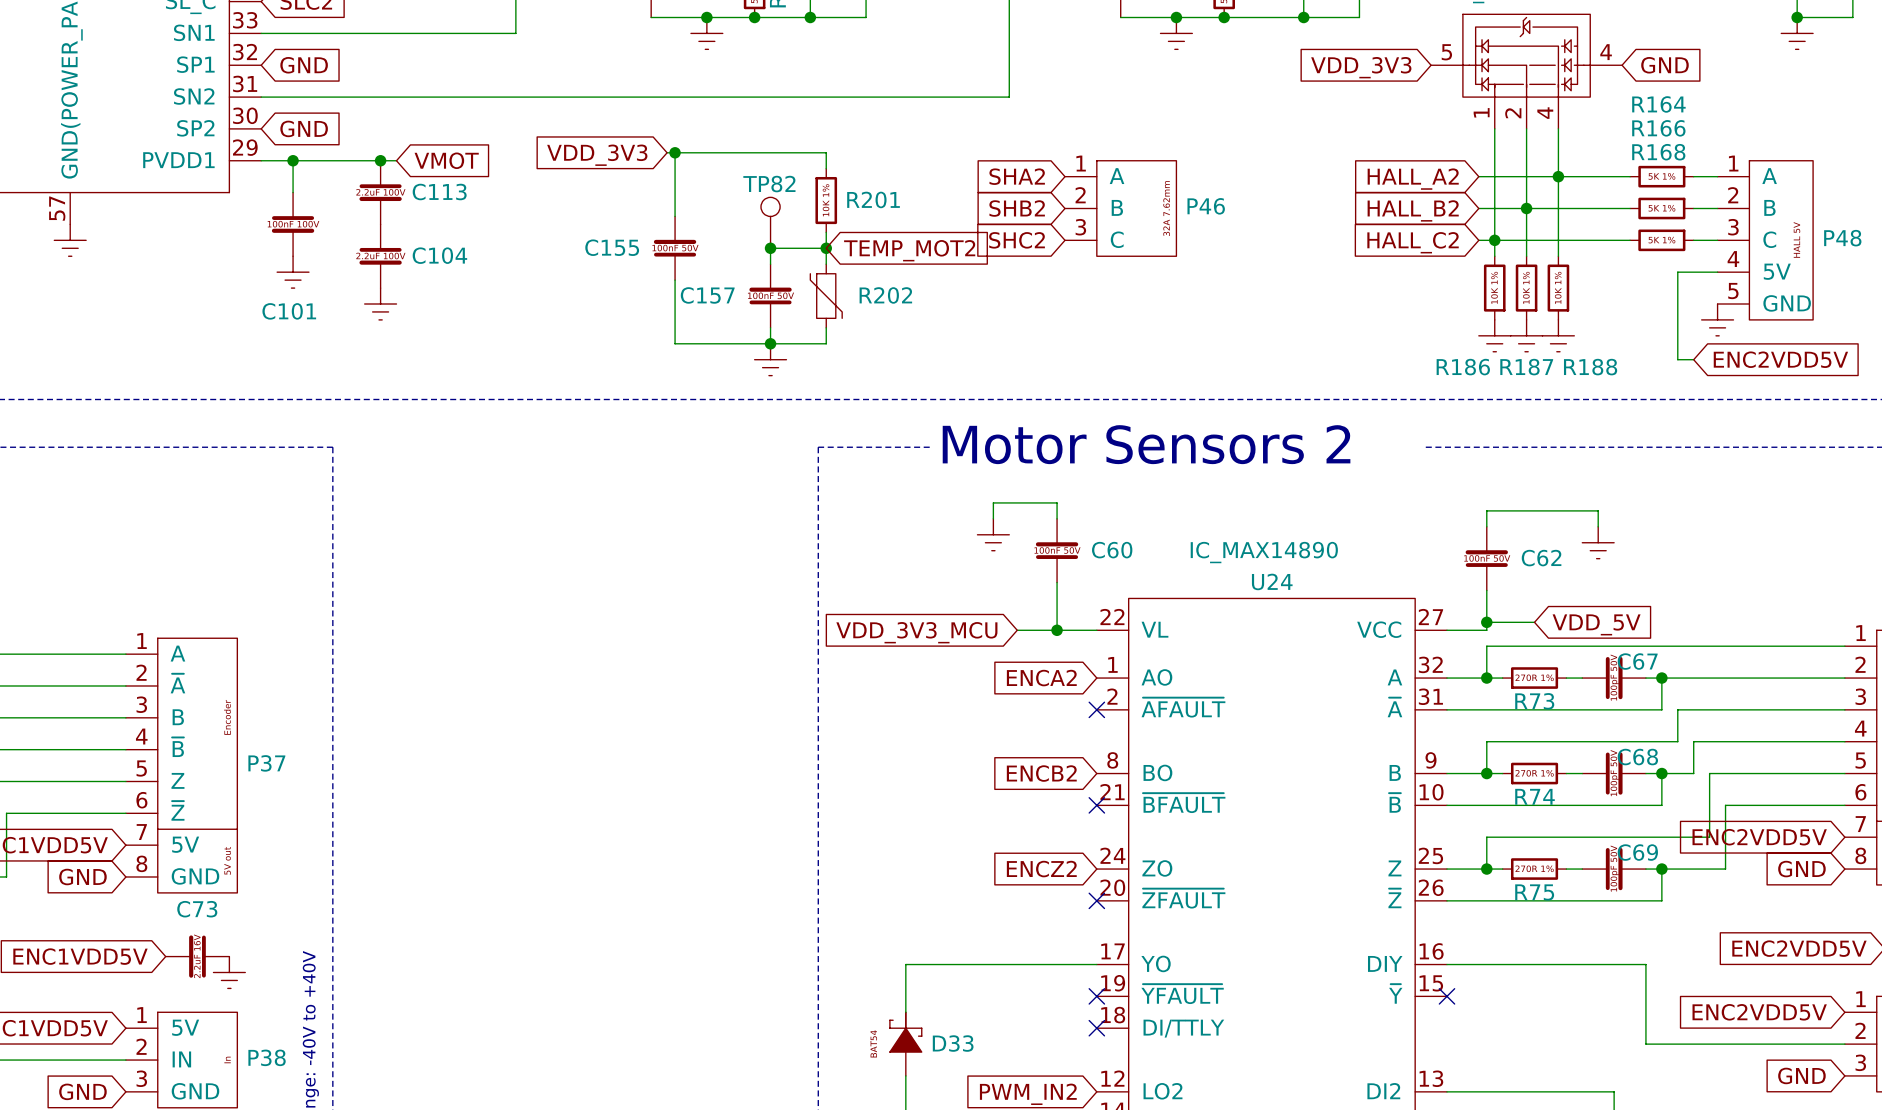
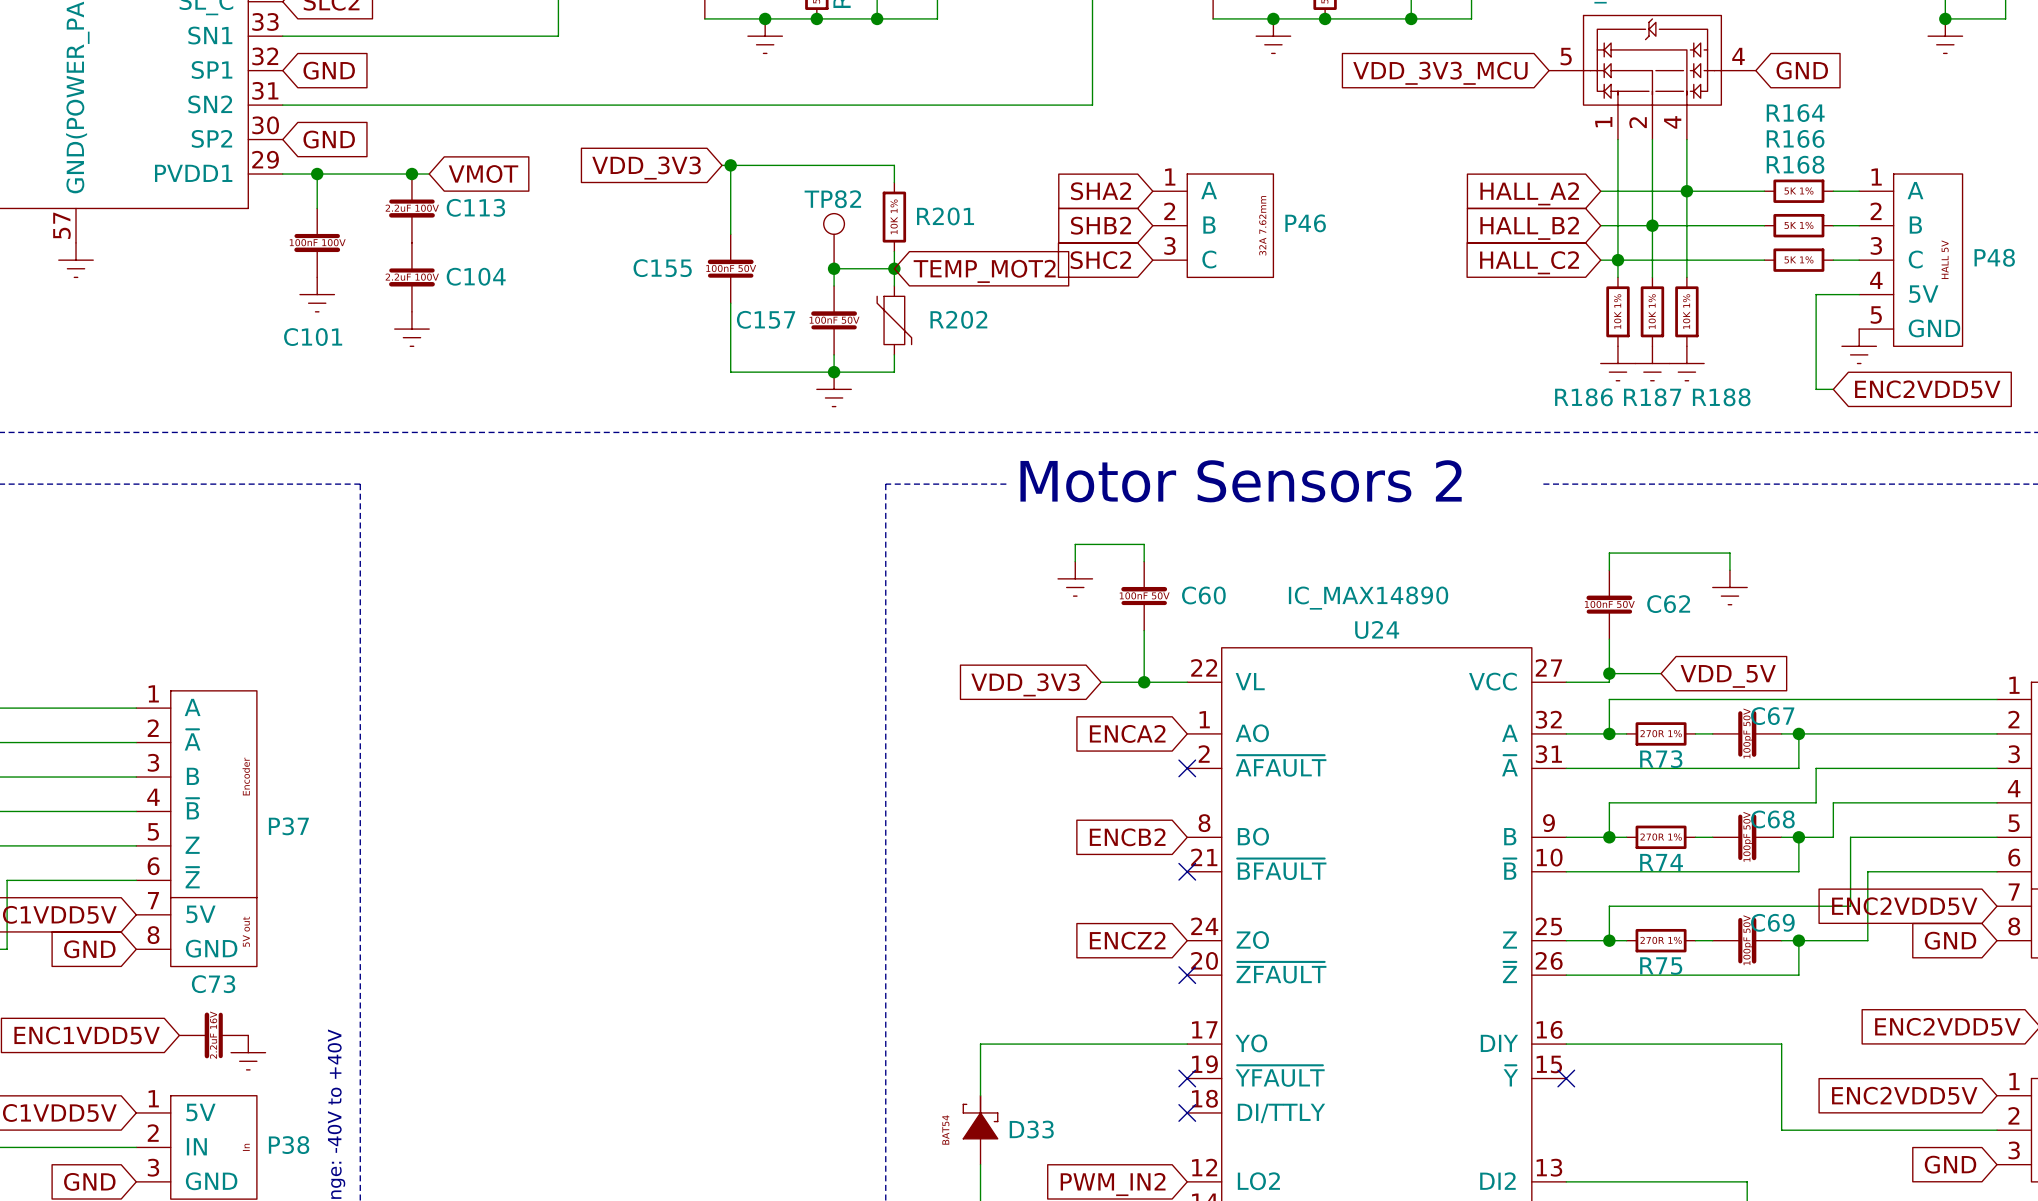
global label: VDD_3V3 (1361, 67) -> VDD_3V3_MCU (1440, 73)
global label: VDD_3V3_MCU (916, 632) -> VDD_3V3 (1025, 684)

